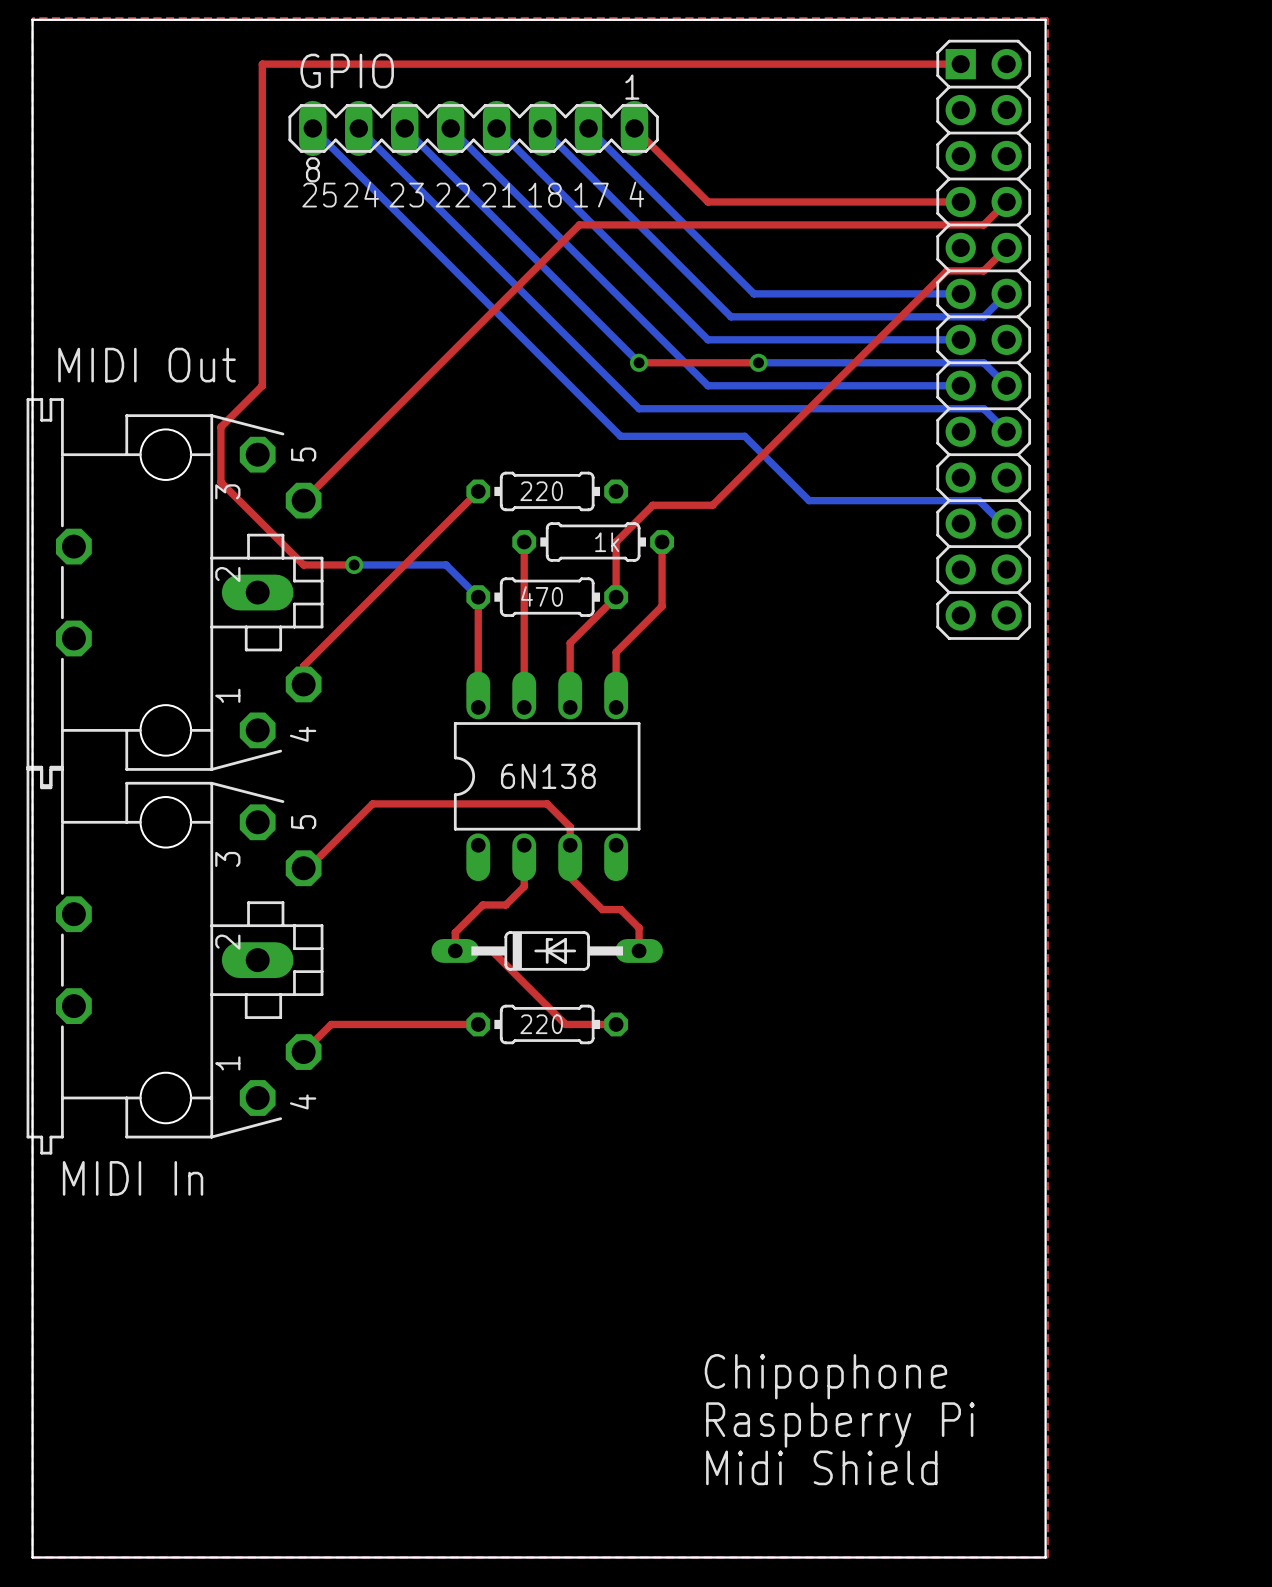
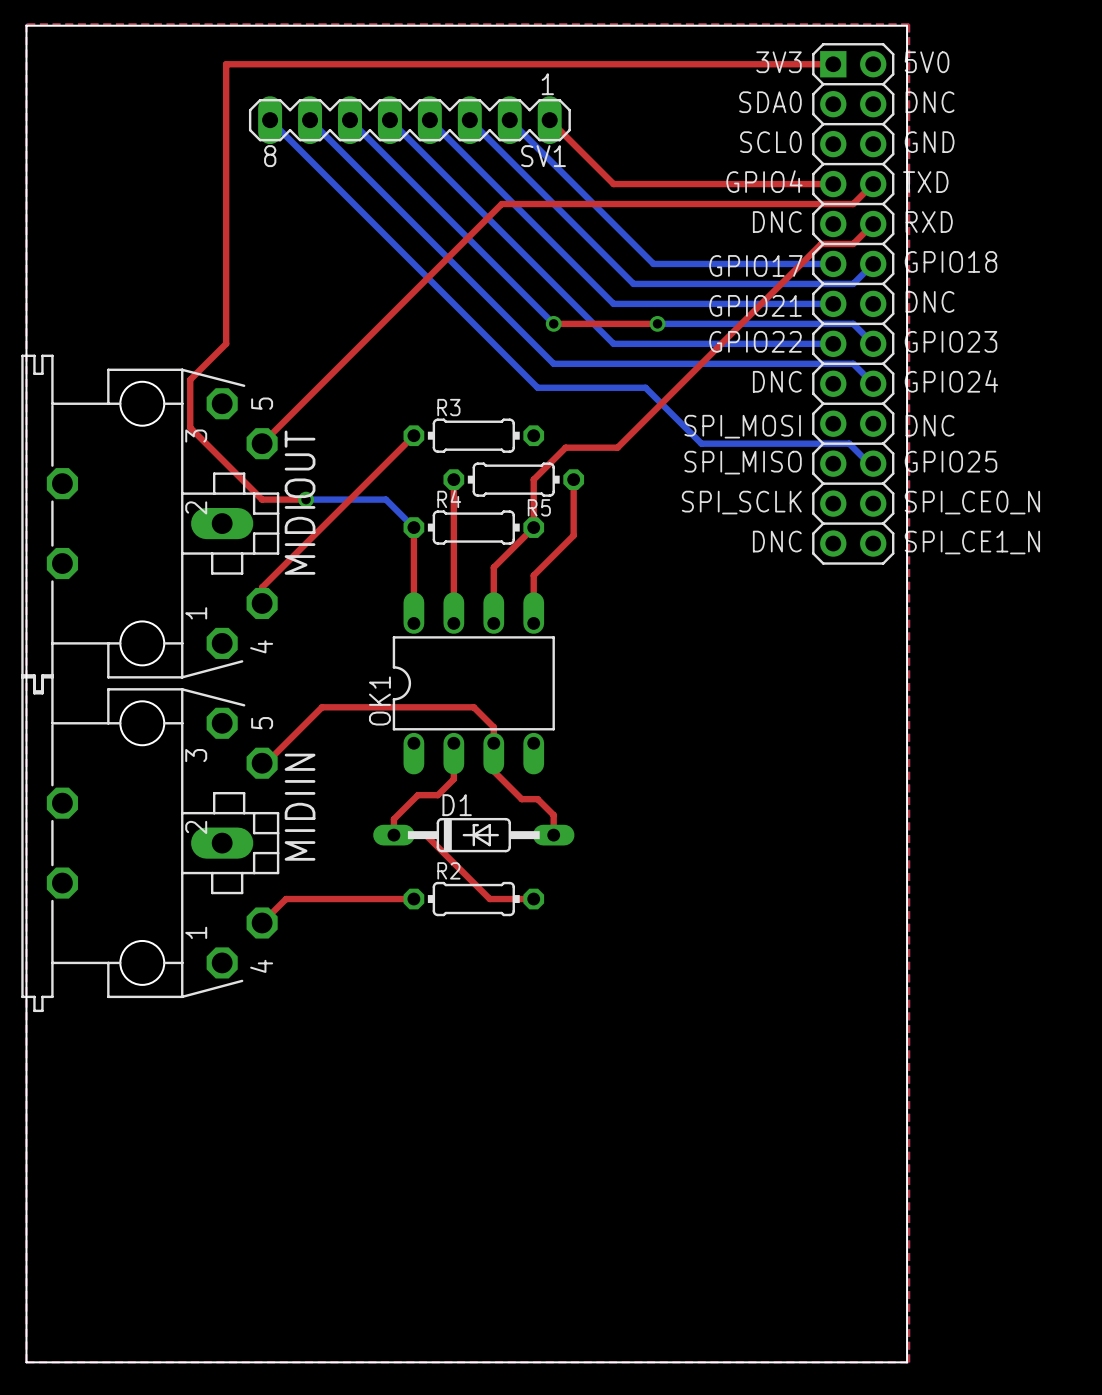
part footprint: [31, 18, 1047, 1559] -> [25, 24, 909, 1364]
text: GPIO (347, 71) -> none
SV1 name: none -> SV1 (543, 156)
text: 24 (361, 194) -> none
text: 4 (636, 194) -> none
text: 25 (319, 195) -> none
text: 23 (406, 195) -> none
text: 22 (452, 195) -> none
text: 21 (498, 195) -> none
text: 18 (545, 195) -> none
text: 17 (591, 195) -> none
text: MIDI Out (147, 365) -> none
R3 name: none -> R3 (448, 407)
R3 value: 220 (541, 491) -> none
R5 value: 1k (607, 542) -> none
R4 name: none -> R4 (449, 499)
MIDIOUT name: none -> MIDIOUT (300, 502)
R5 name: none -> R5 (539, 507)
R4 value: 470 (542, 596) -> none
OK1 value: 6N138 (548, 776) -> none
OK1 name: none -> OK1 (379, 701)
D1 name: none -> D1 (457, 805)
MIDIIN name: none -> MIDIIN (300, 807)
R2 name: none -> R2 (448, 870)
R2 value: 220 (541, 1024) -> none
text: MIDI In (133, 1178) -> none
text: Chipophone (825, 1376) -> none
text: Raspberry Pi (840, 1425) -> none
text: Midi Shield (821, 1467) -> none

